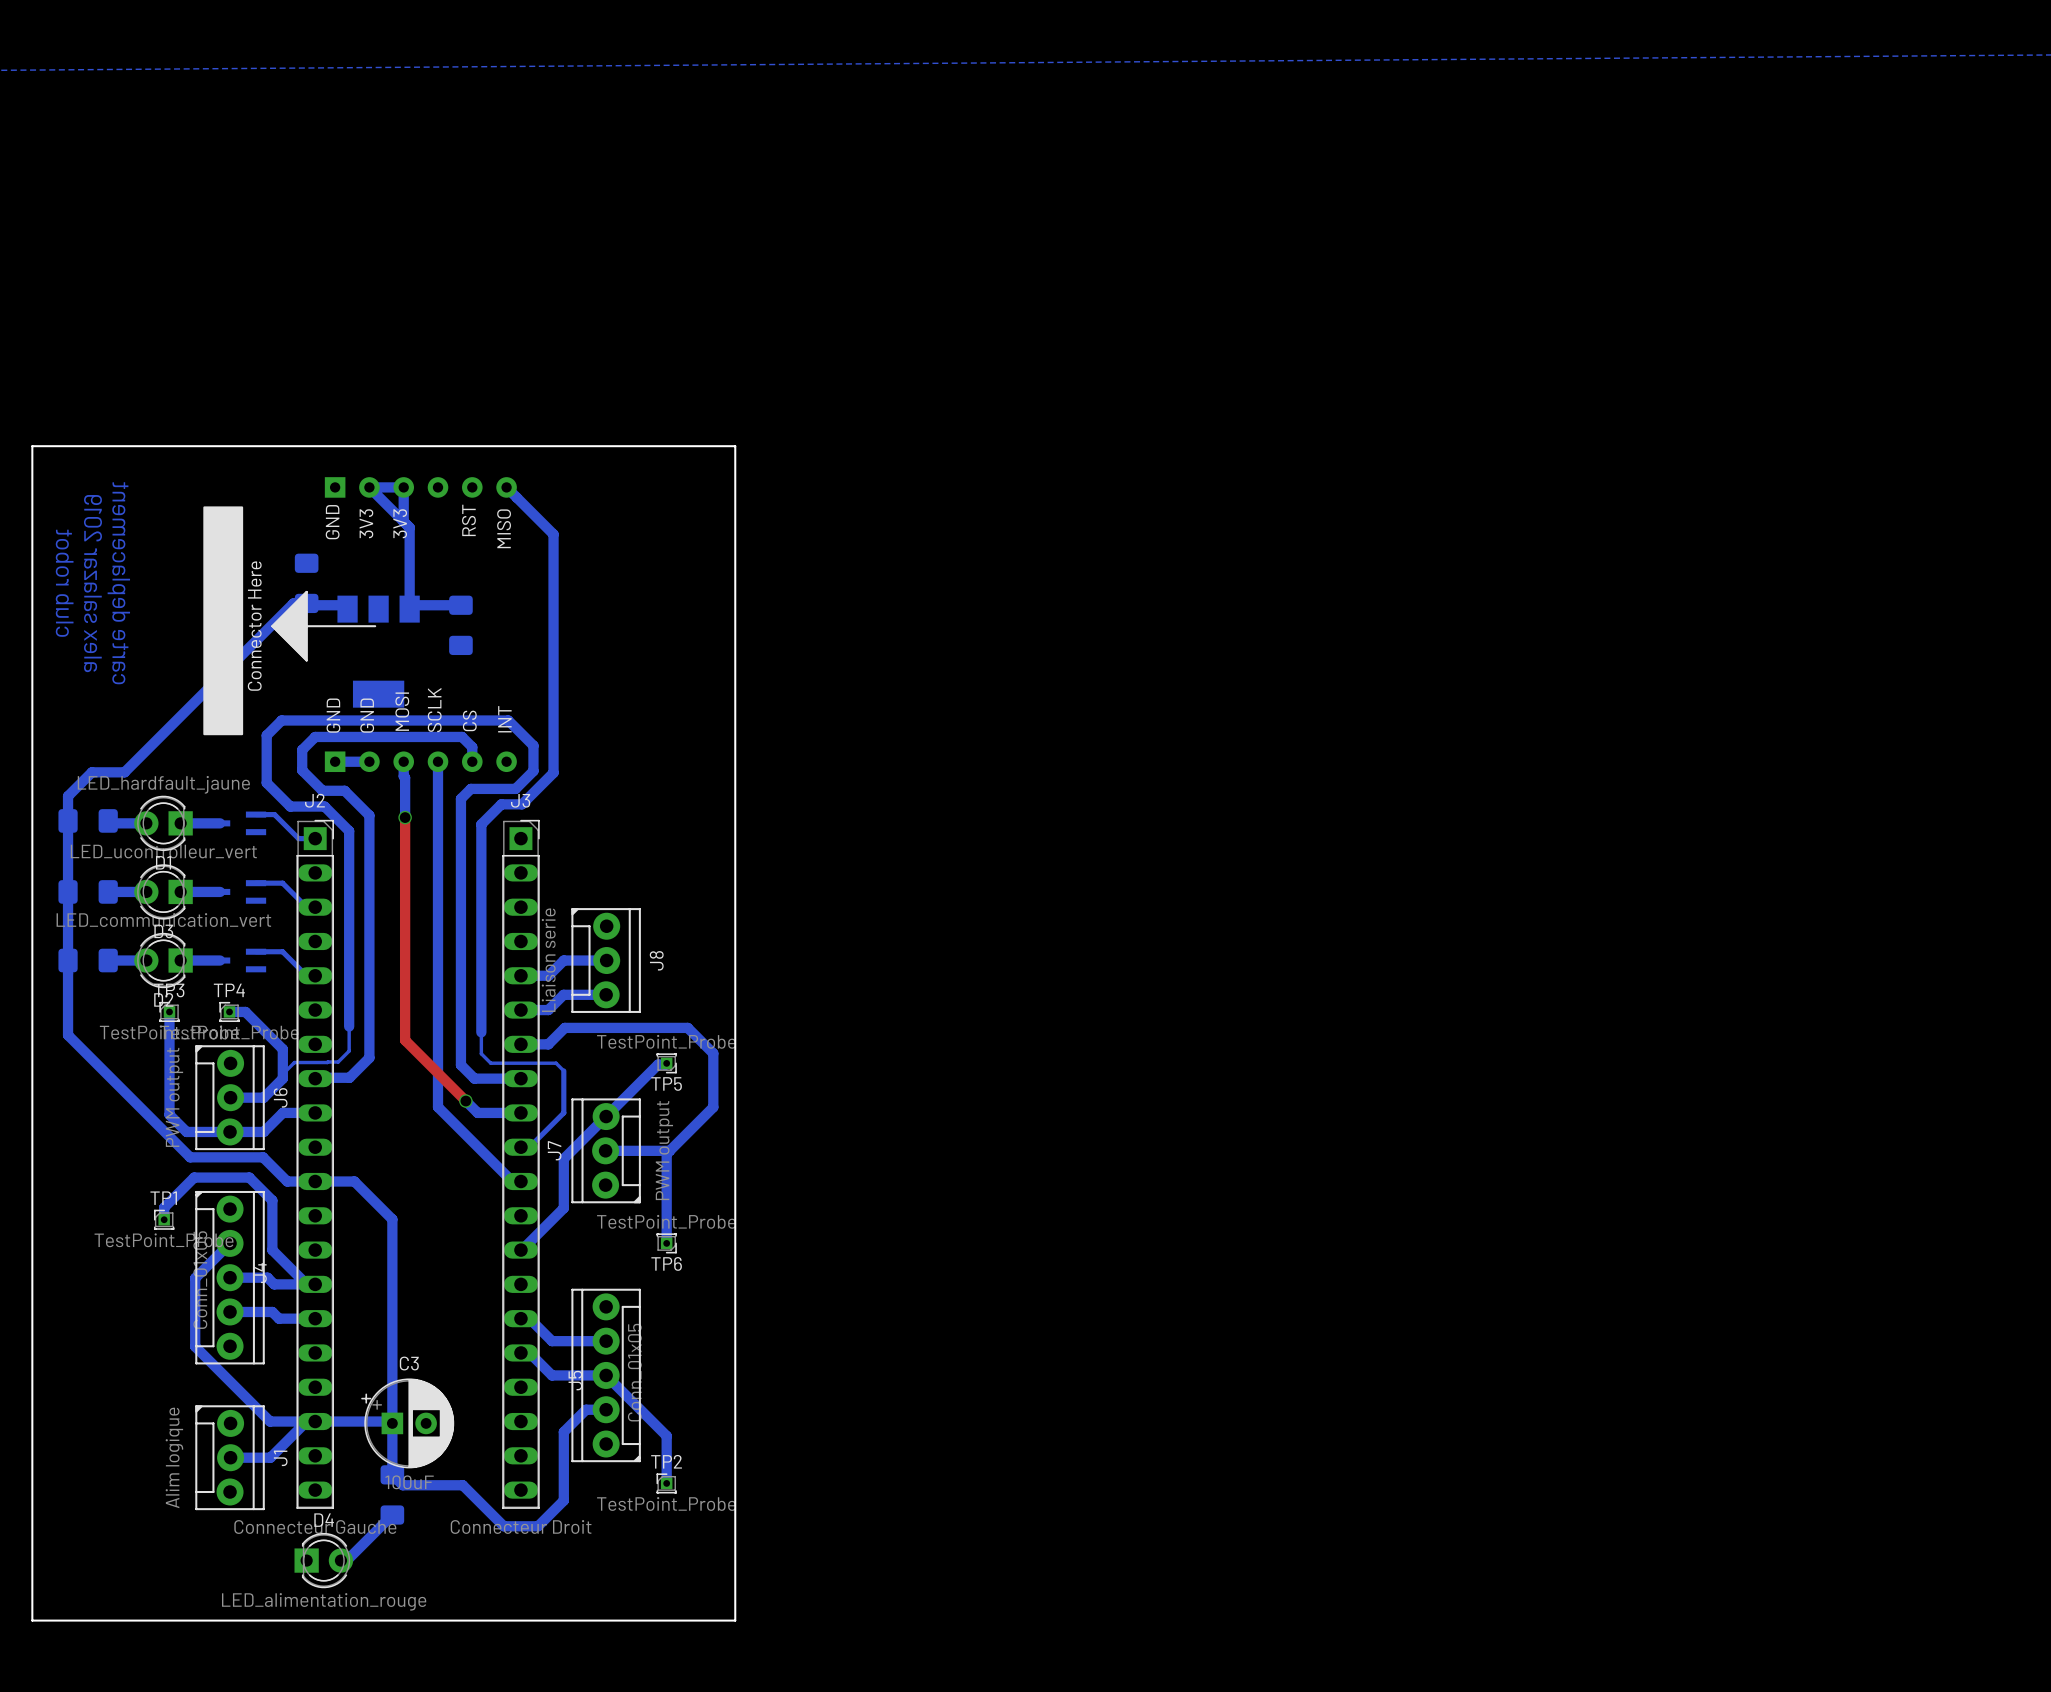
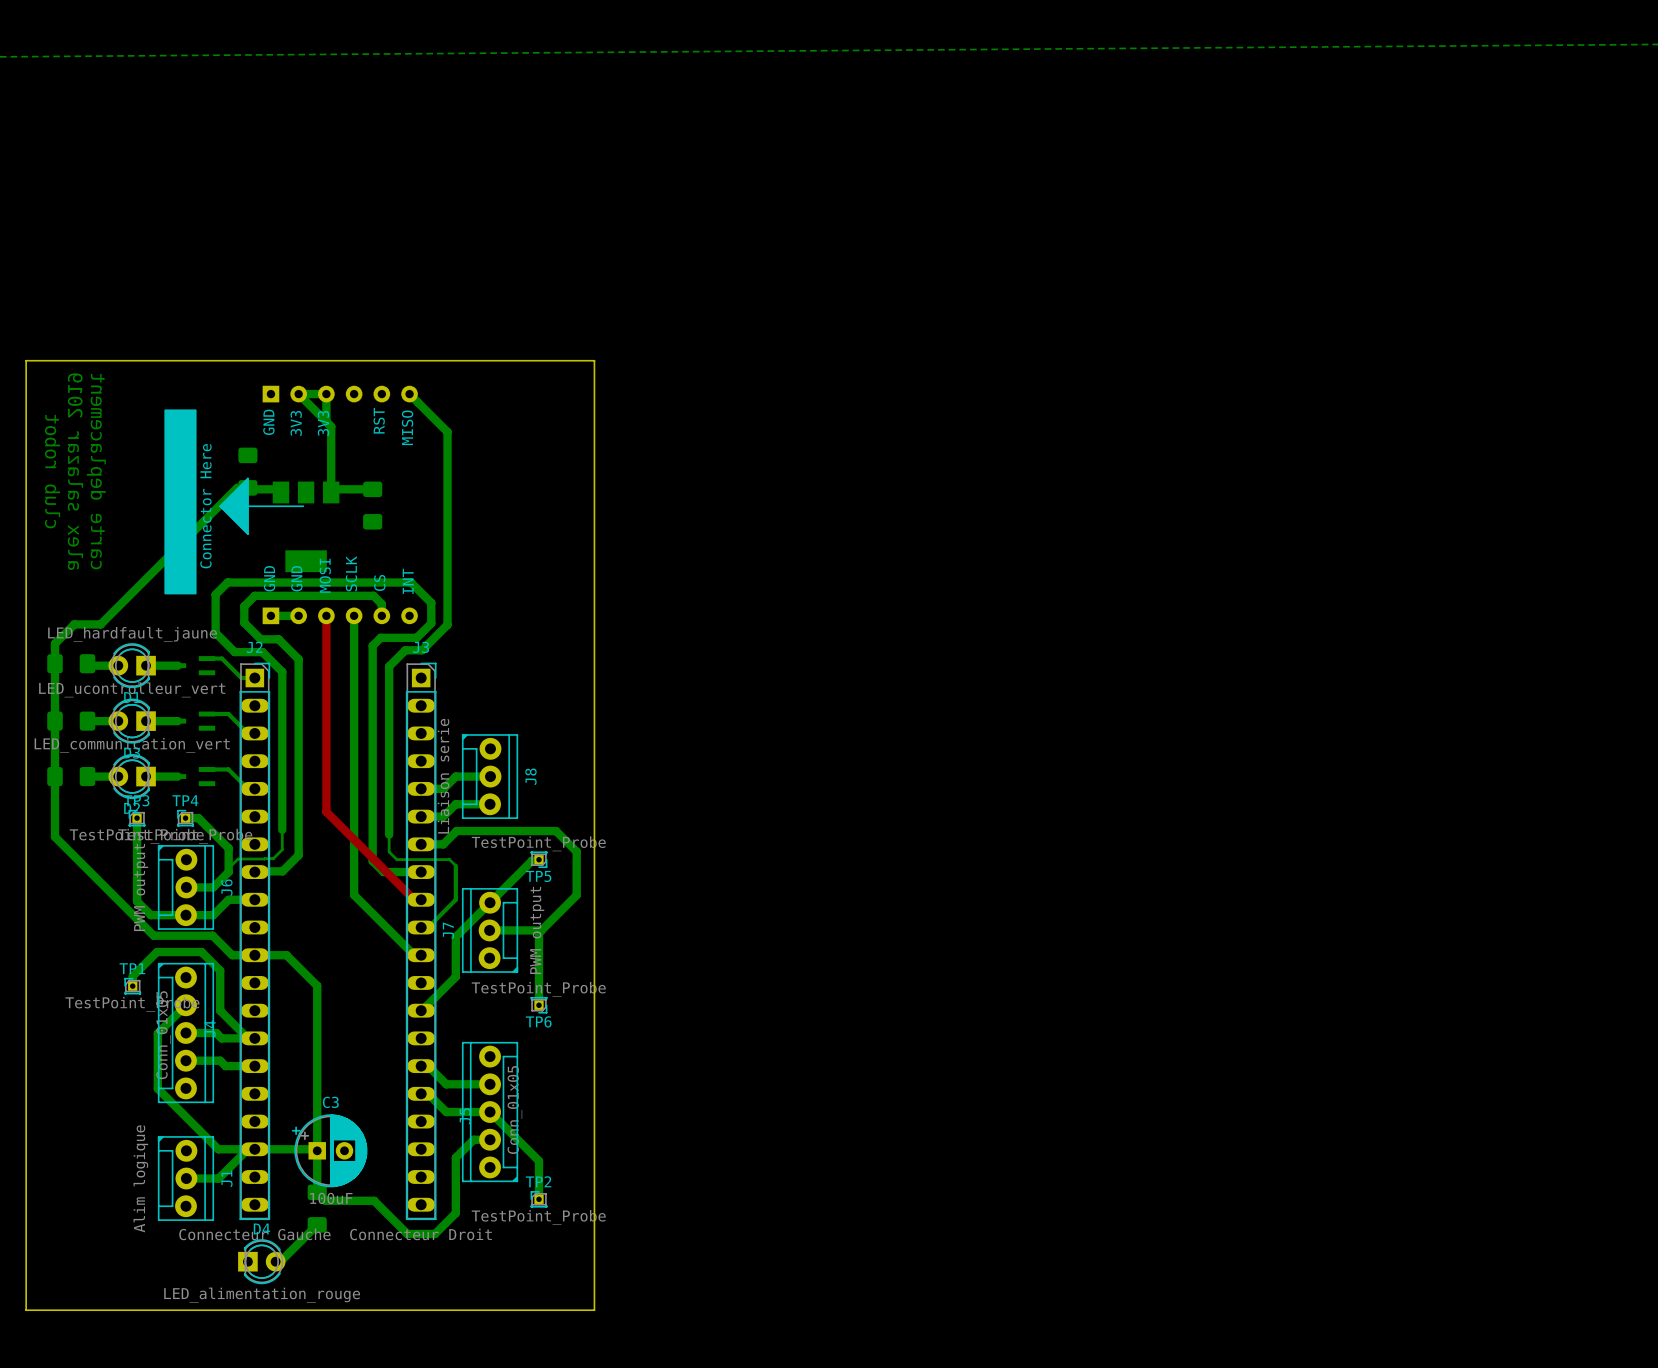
bottom track: (403, 761) (405, 817) -> none
top track: none -> (326, 615) (326, 811) (414, 899)
top track: (405, 817) (405, 1040) (465, 1101) -> none
via: (405, 817) -> none
bottom track: (465, 1101) (477, 1112) (520, 1112) -> none
via: (465, 1101) -> none

